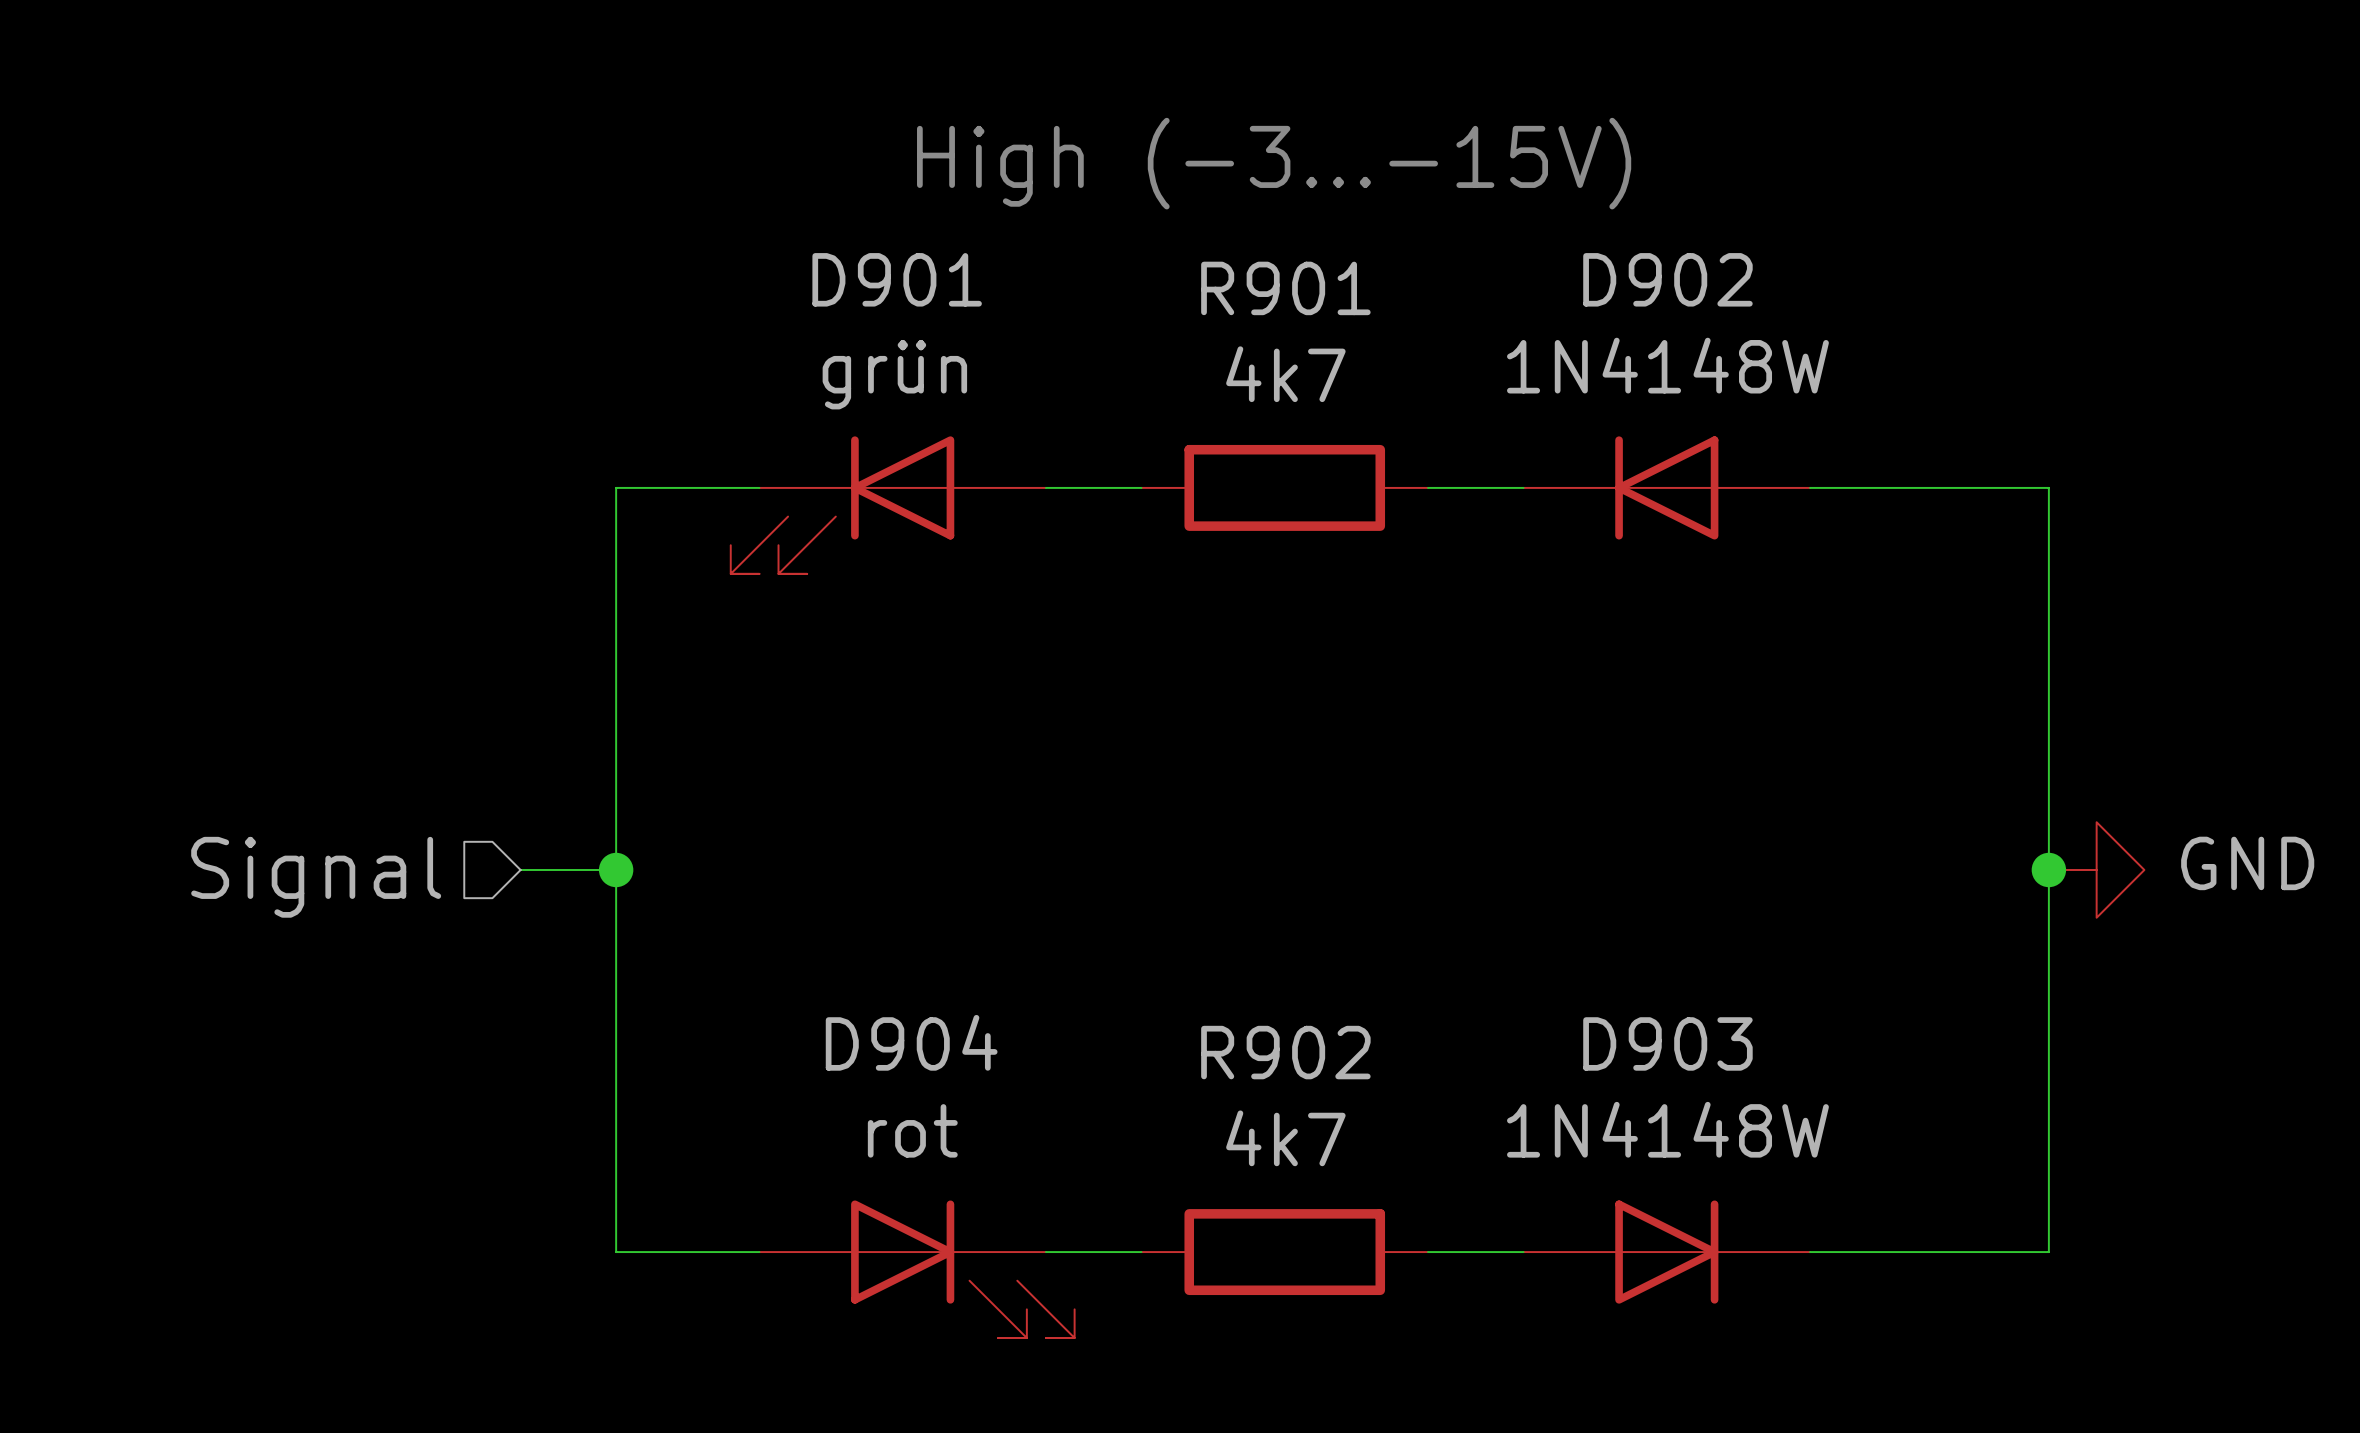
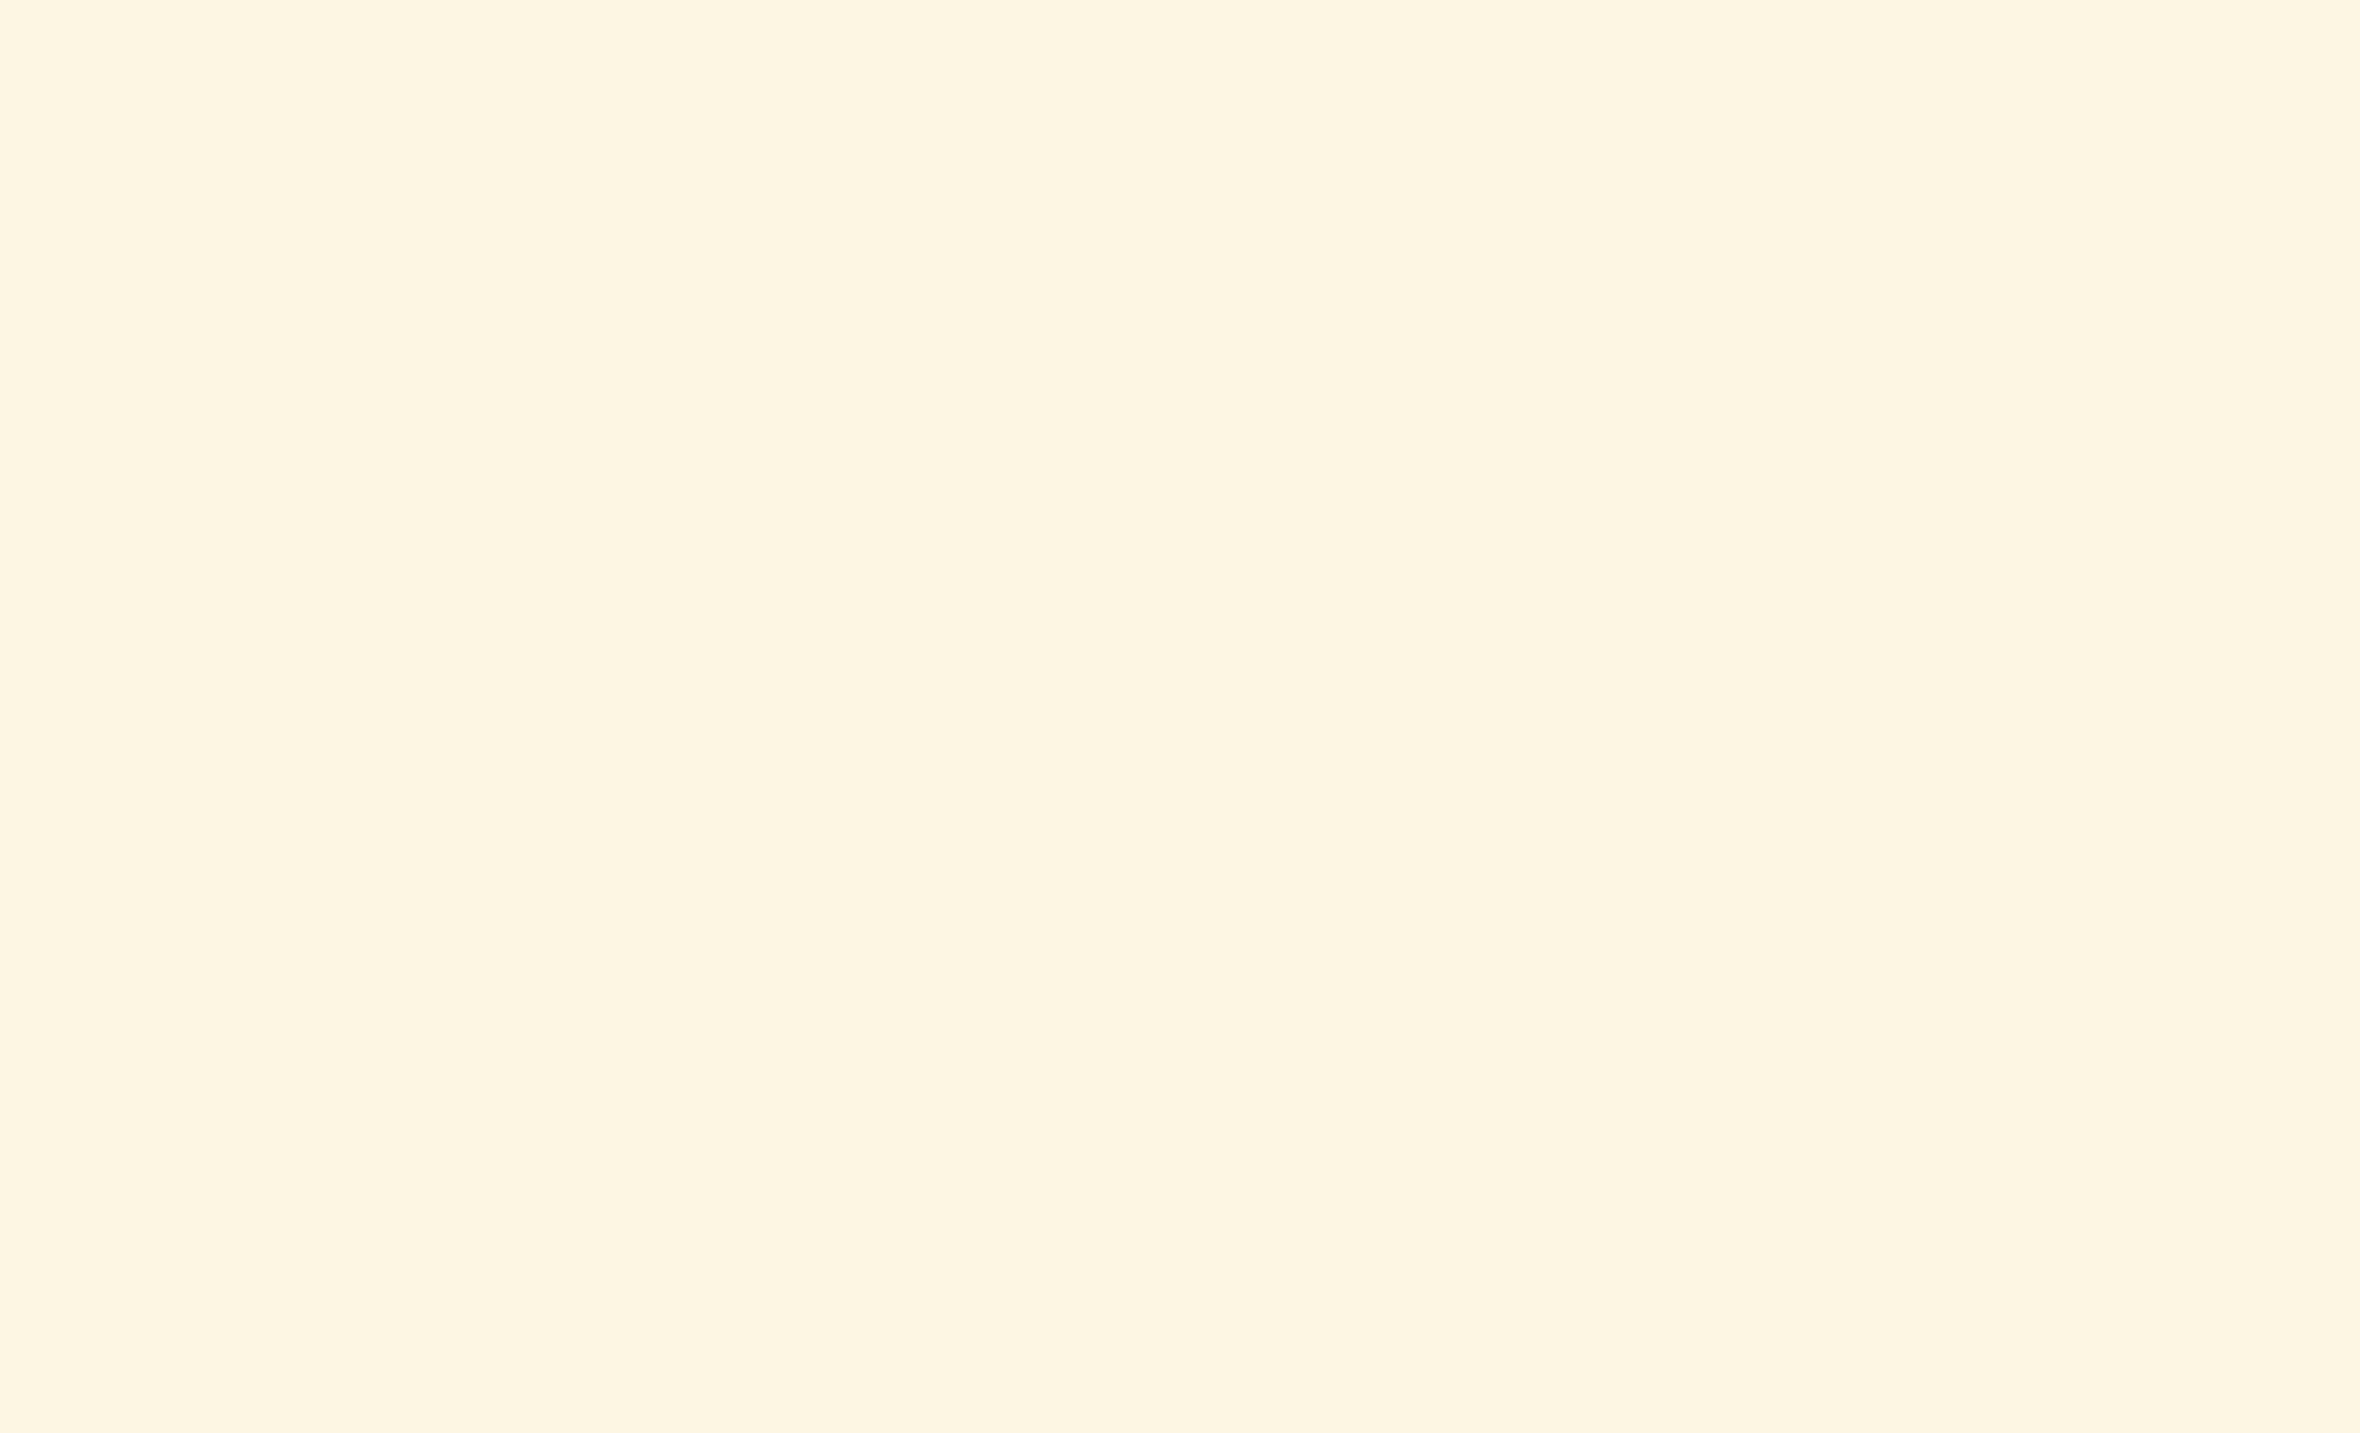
text: High (-3...-15V) (1274, 163) -> none
wire: (759, 487) (616, 487) (616, 1252) (759, 1252) -> none
wire: (1045, 487) (1141, 487) -> none
R901: 4k7 (1284, 487) -> none
wire: (1428, 487) (1523, 487) -> none
D902: 1N4148W (1666, 487) -> none
wire: (1810, 487) (2048, 487) (2048, 1252) (1810, 1252) -> none
D901: grün (888, 505) -> none
wire: (520, 869) (616, 869) -> none
junction: (616, 869) -> none
junction: (2048, 869) -> none
power symbol: GND (2096, 869) -> none
hierarchical label: Signal (316, 877) -> none
wire: (1045, 1252) (1141, 1252) -> none
R902: 4k7 (1284, 1252) -> none
wire: (1428, 1252) (1523, 1252) -> none
D903: 1N4148W (1666, 1252) -> none
D904: rot (917, 1269) -> none

